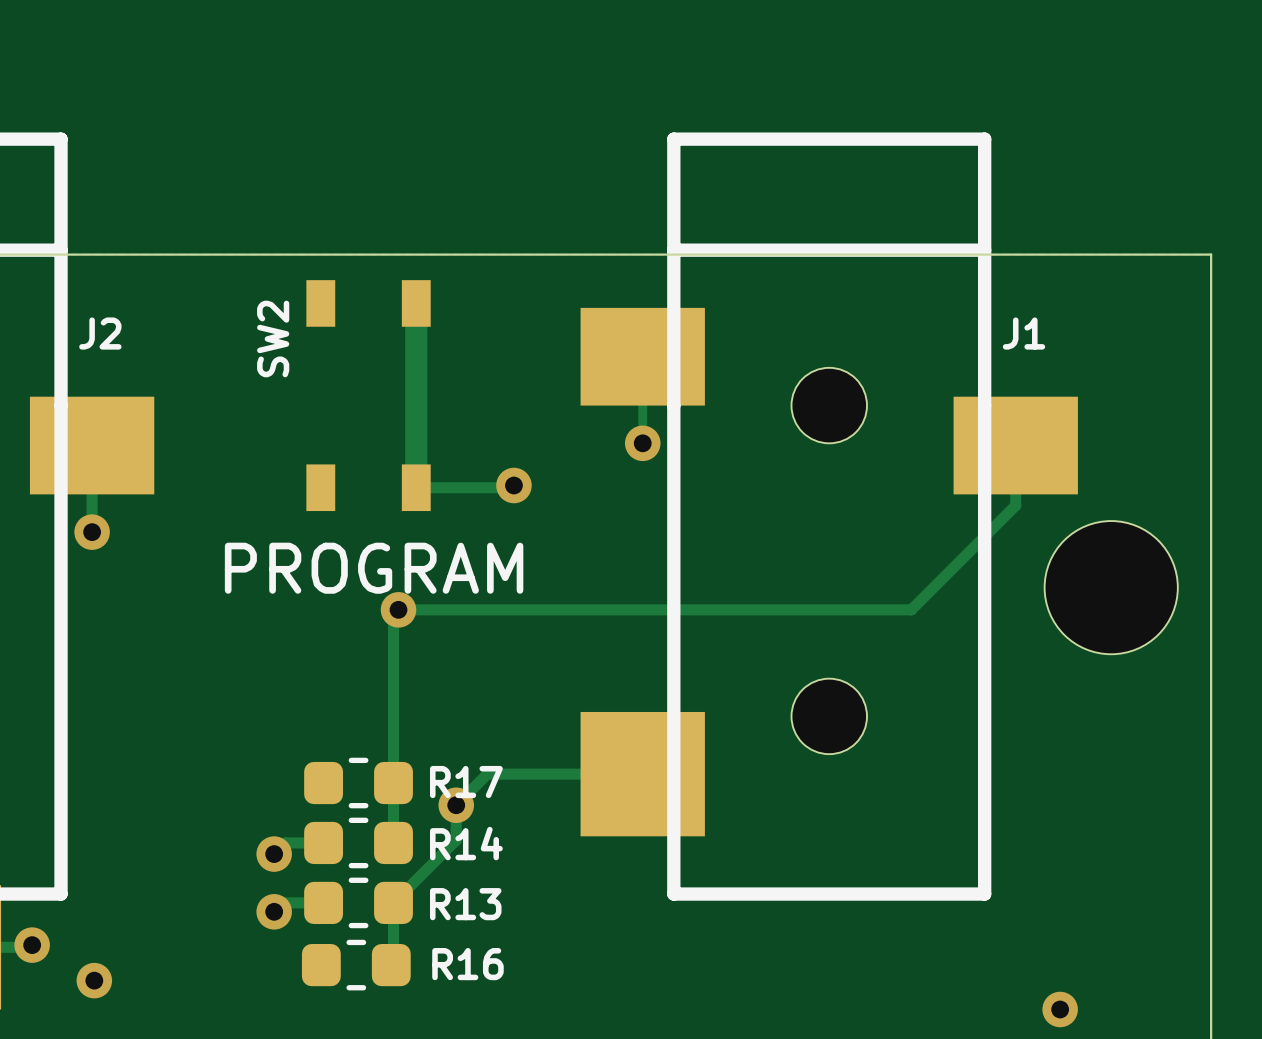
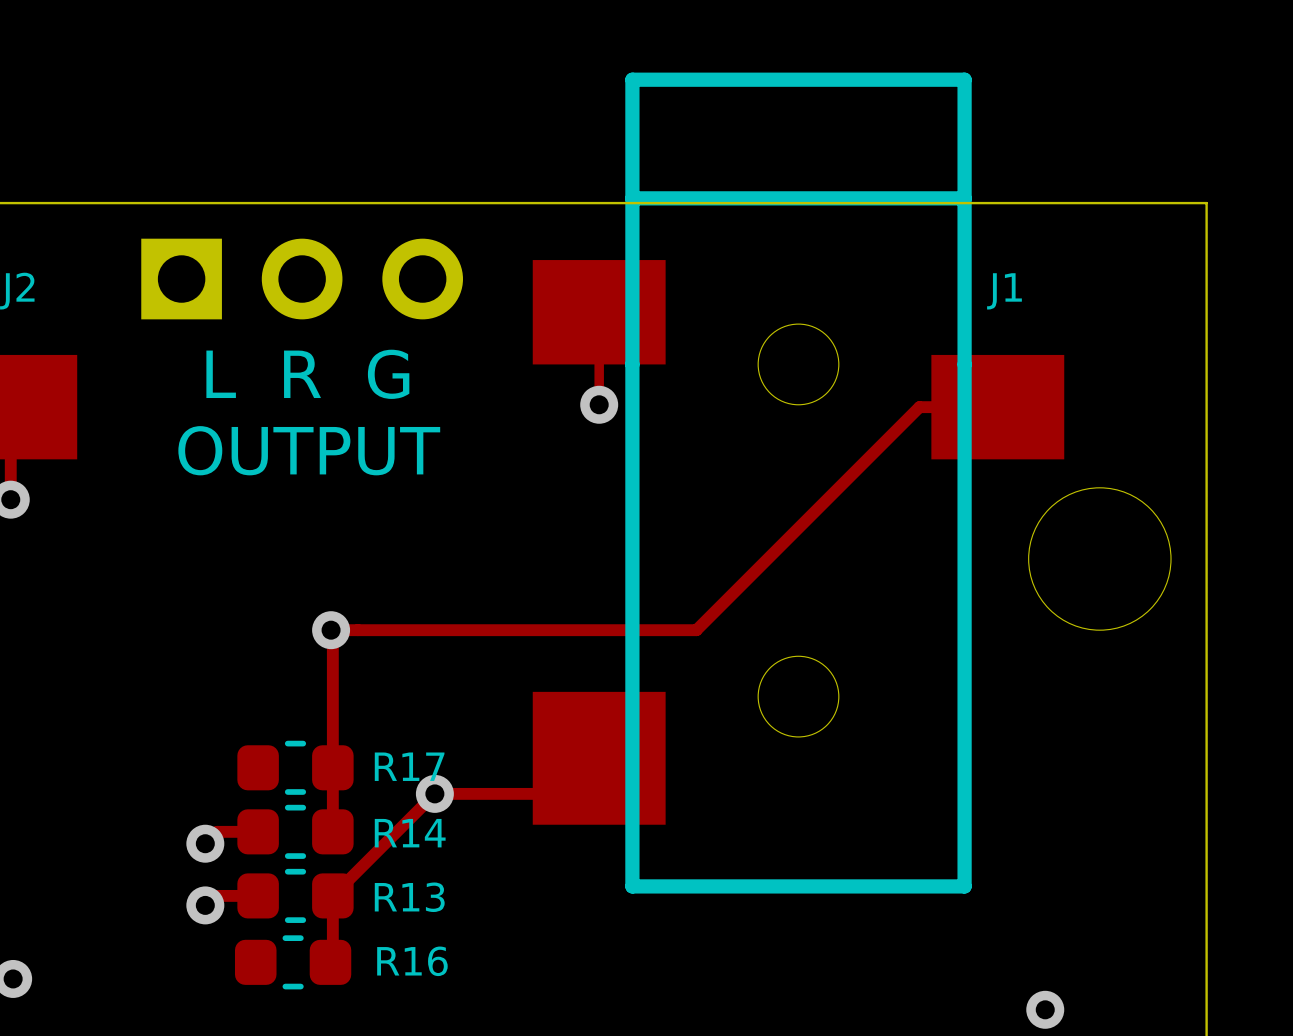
track: (416, 303) (416, 487) (511, 487) (513, 485) -> none
part: none -> (302, 279)
SW2: (368, 395) -> none
text: none -> L R G (307, 374)
track: (1015, 445) (1015, 505) (911, 609) (398, 609) (393, 614) (393, 655) -> (997, 407) (919, 407) (696, 630) (331, 630) (332, 631)
via: (513, 485) -> none
text: none -> OUTPUT (309, 450)
text: PROGRAM (374, 568) -> none
via position: (398, 609) -> (331, 630)
track: (642, 774) (487, 774) (456, 805) (456, 840) -> (599, 758) (563, 793) (434, 793) (399, 828)
via position: (456, 805) -> (434, 793)

